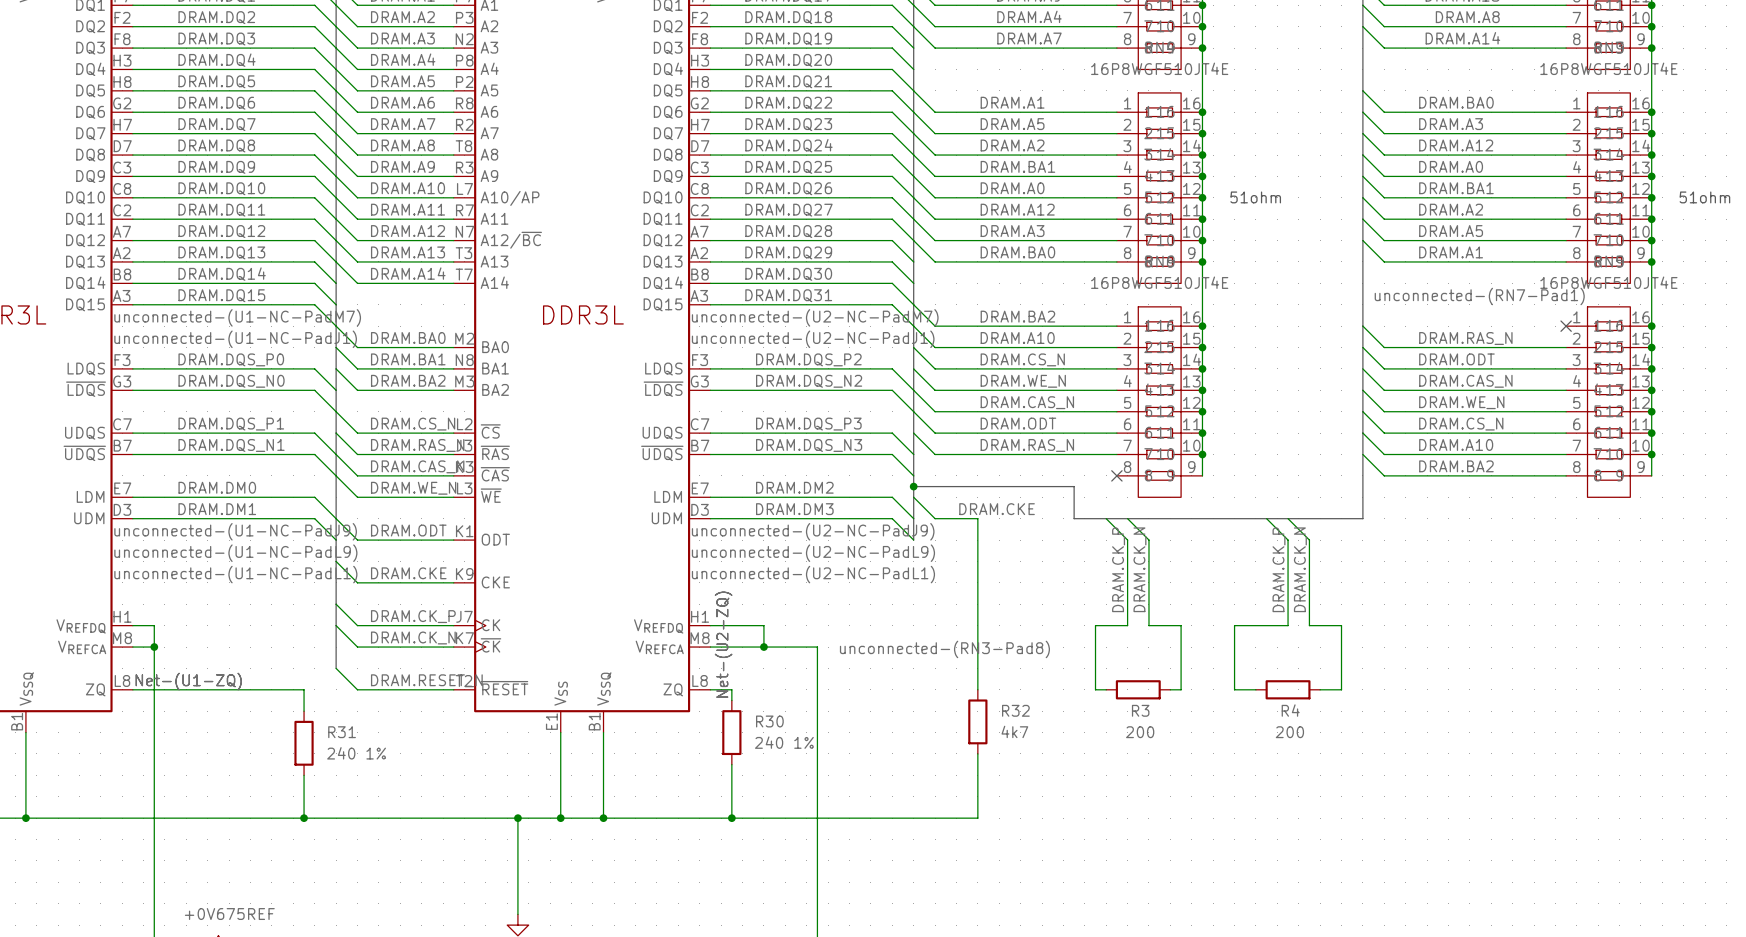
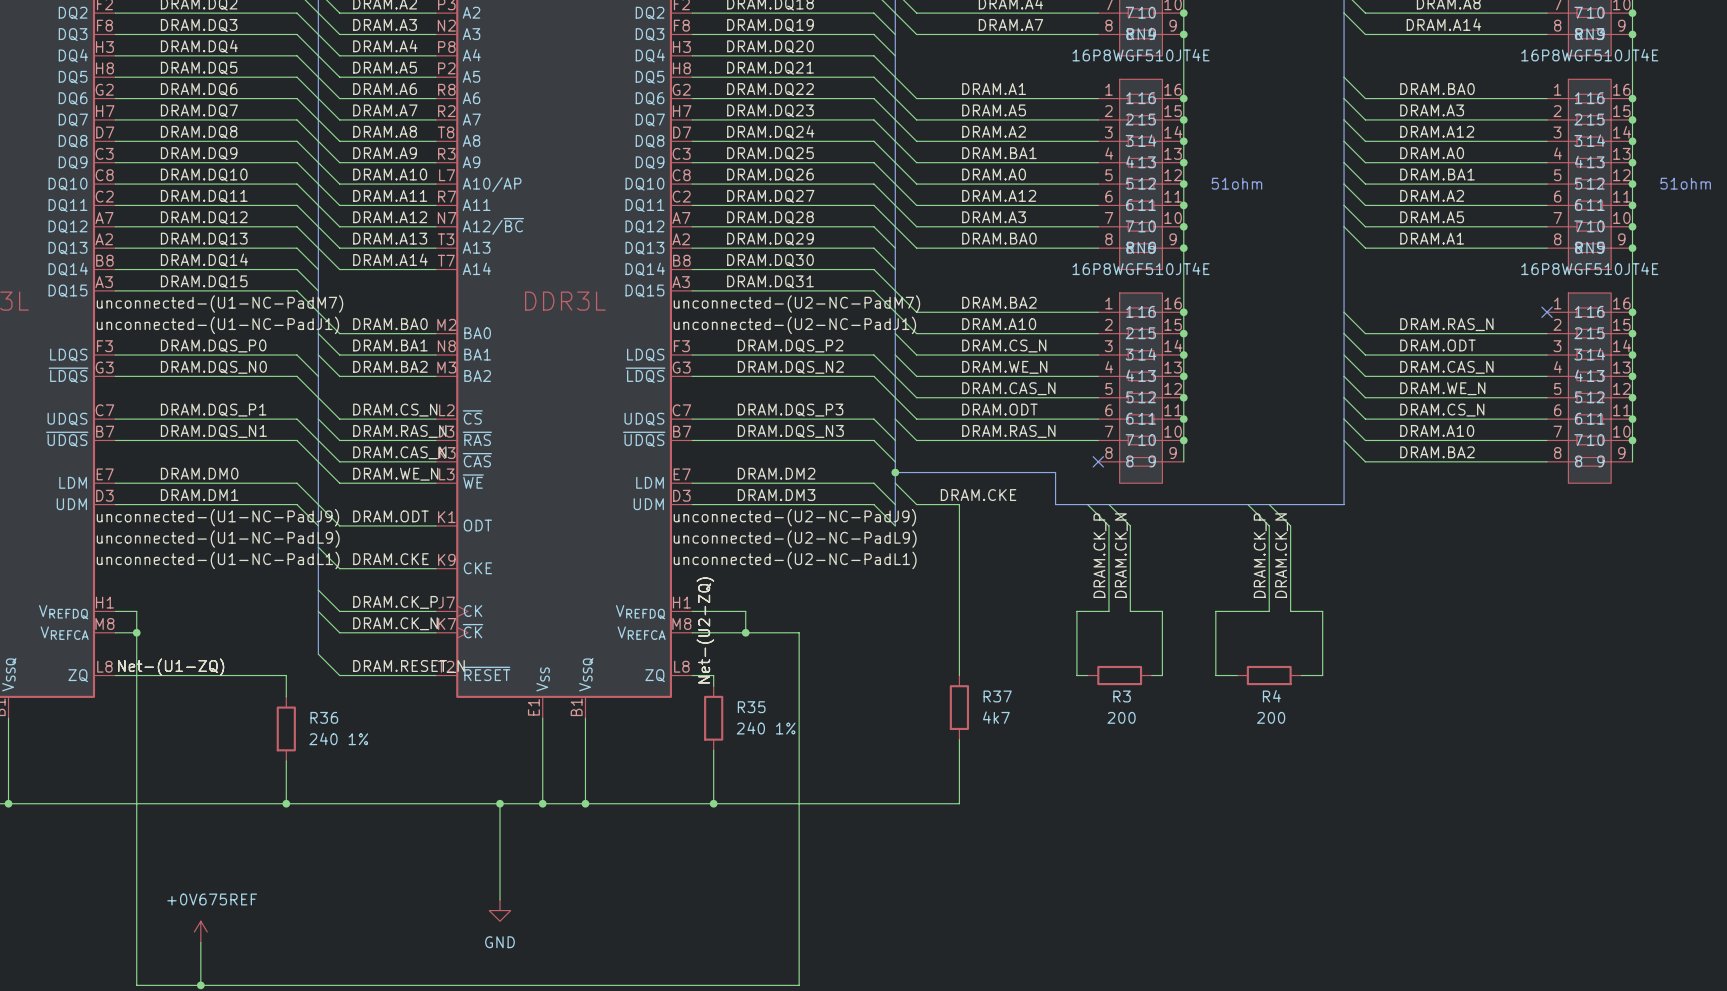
label: unconnected-(RN7-Pad1) (1479, 296) -> none
label: unconnected-(RN3-Pad8) (944, 649) -> none
R32 name: R32 (1015, 710) -> R37 (997, 696)
R30 name: R30 (769, 721) -> R35 (751, 707)
R31 name: R31 (342, 732) -> R36 (324, 717)

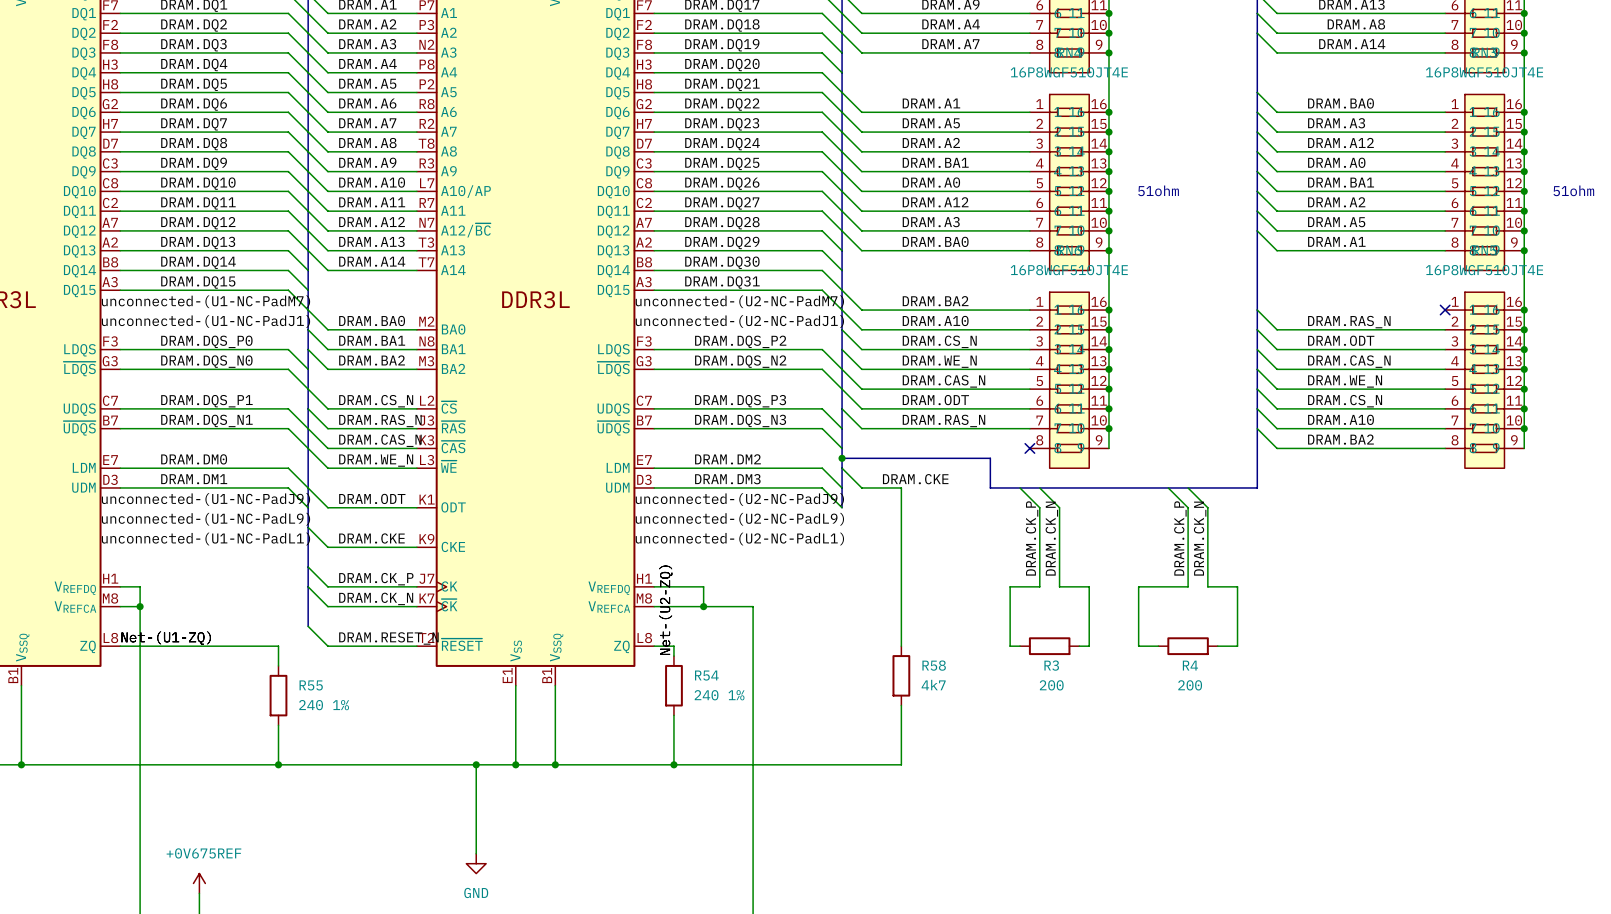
R37 name: R37 (997, 696) -> R58 (934, 665)
R35 name: R35 (751, 707) -> R54 (706, 675)
R36 name: R36 (324, 717) -> R55 (311, 685)

